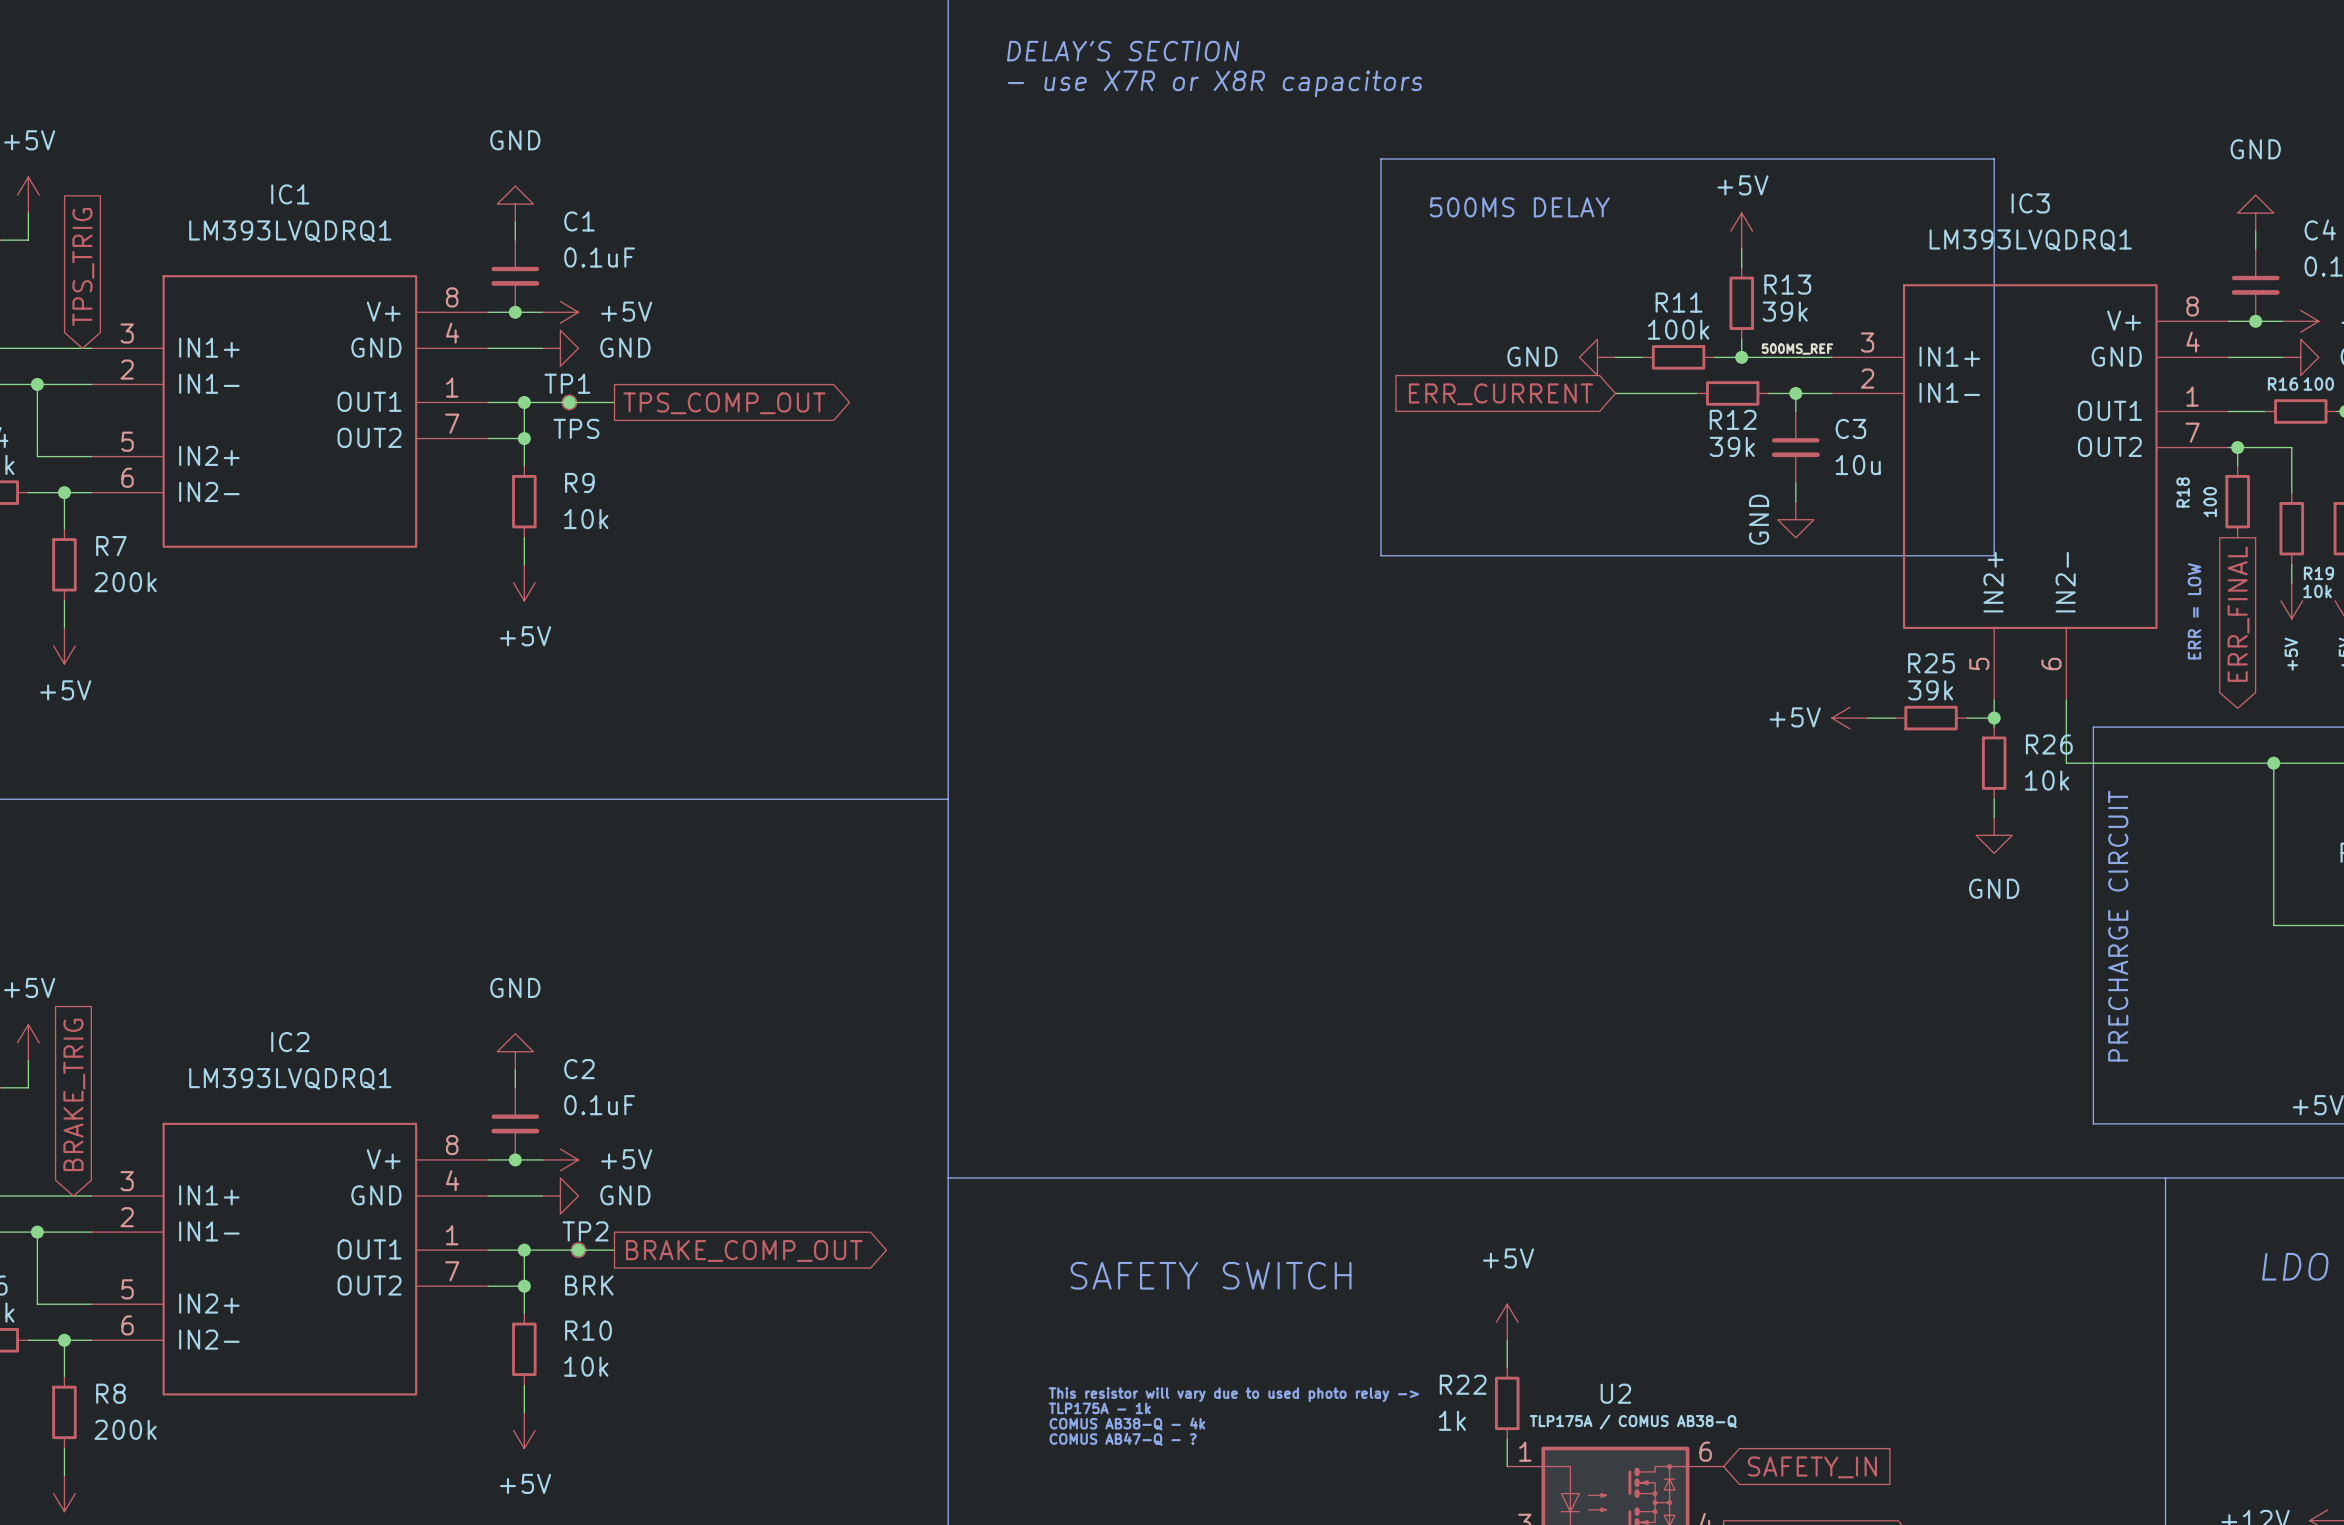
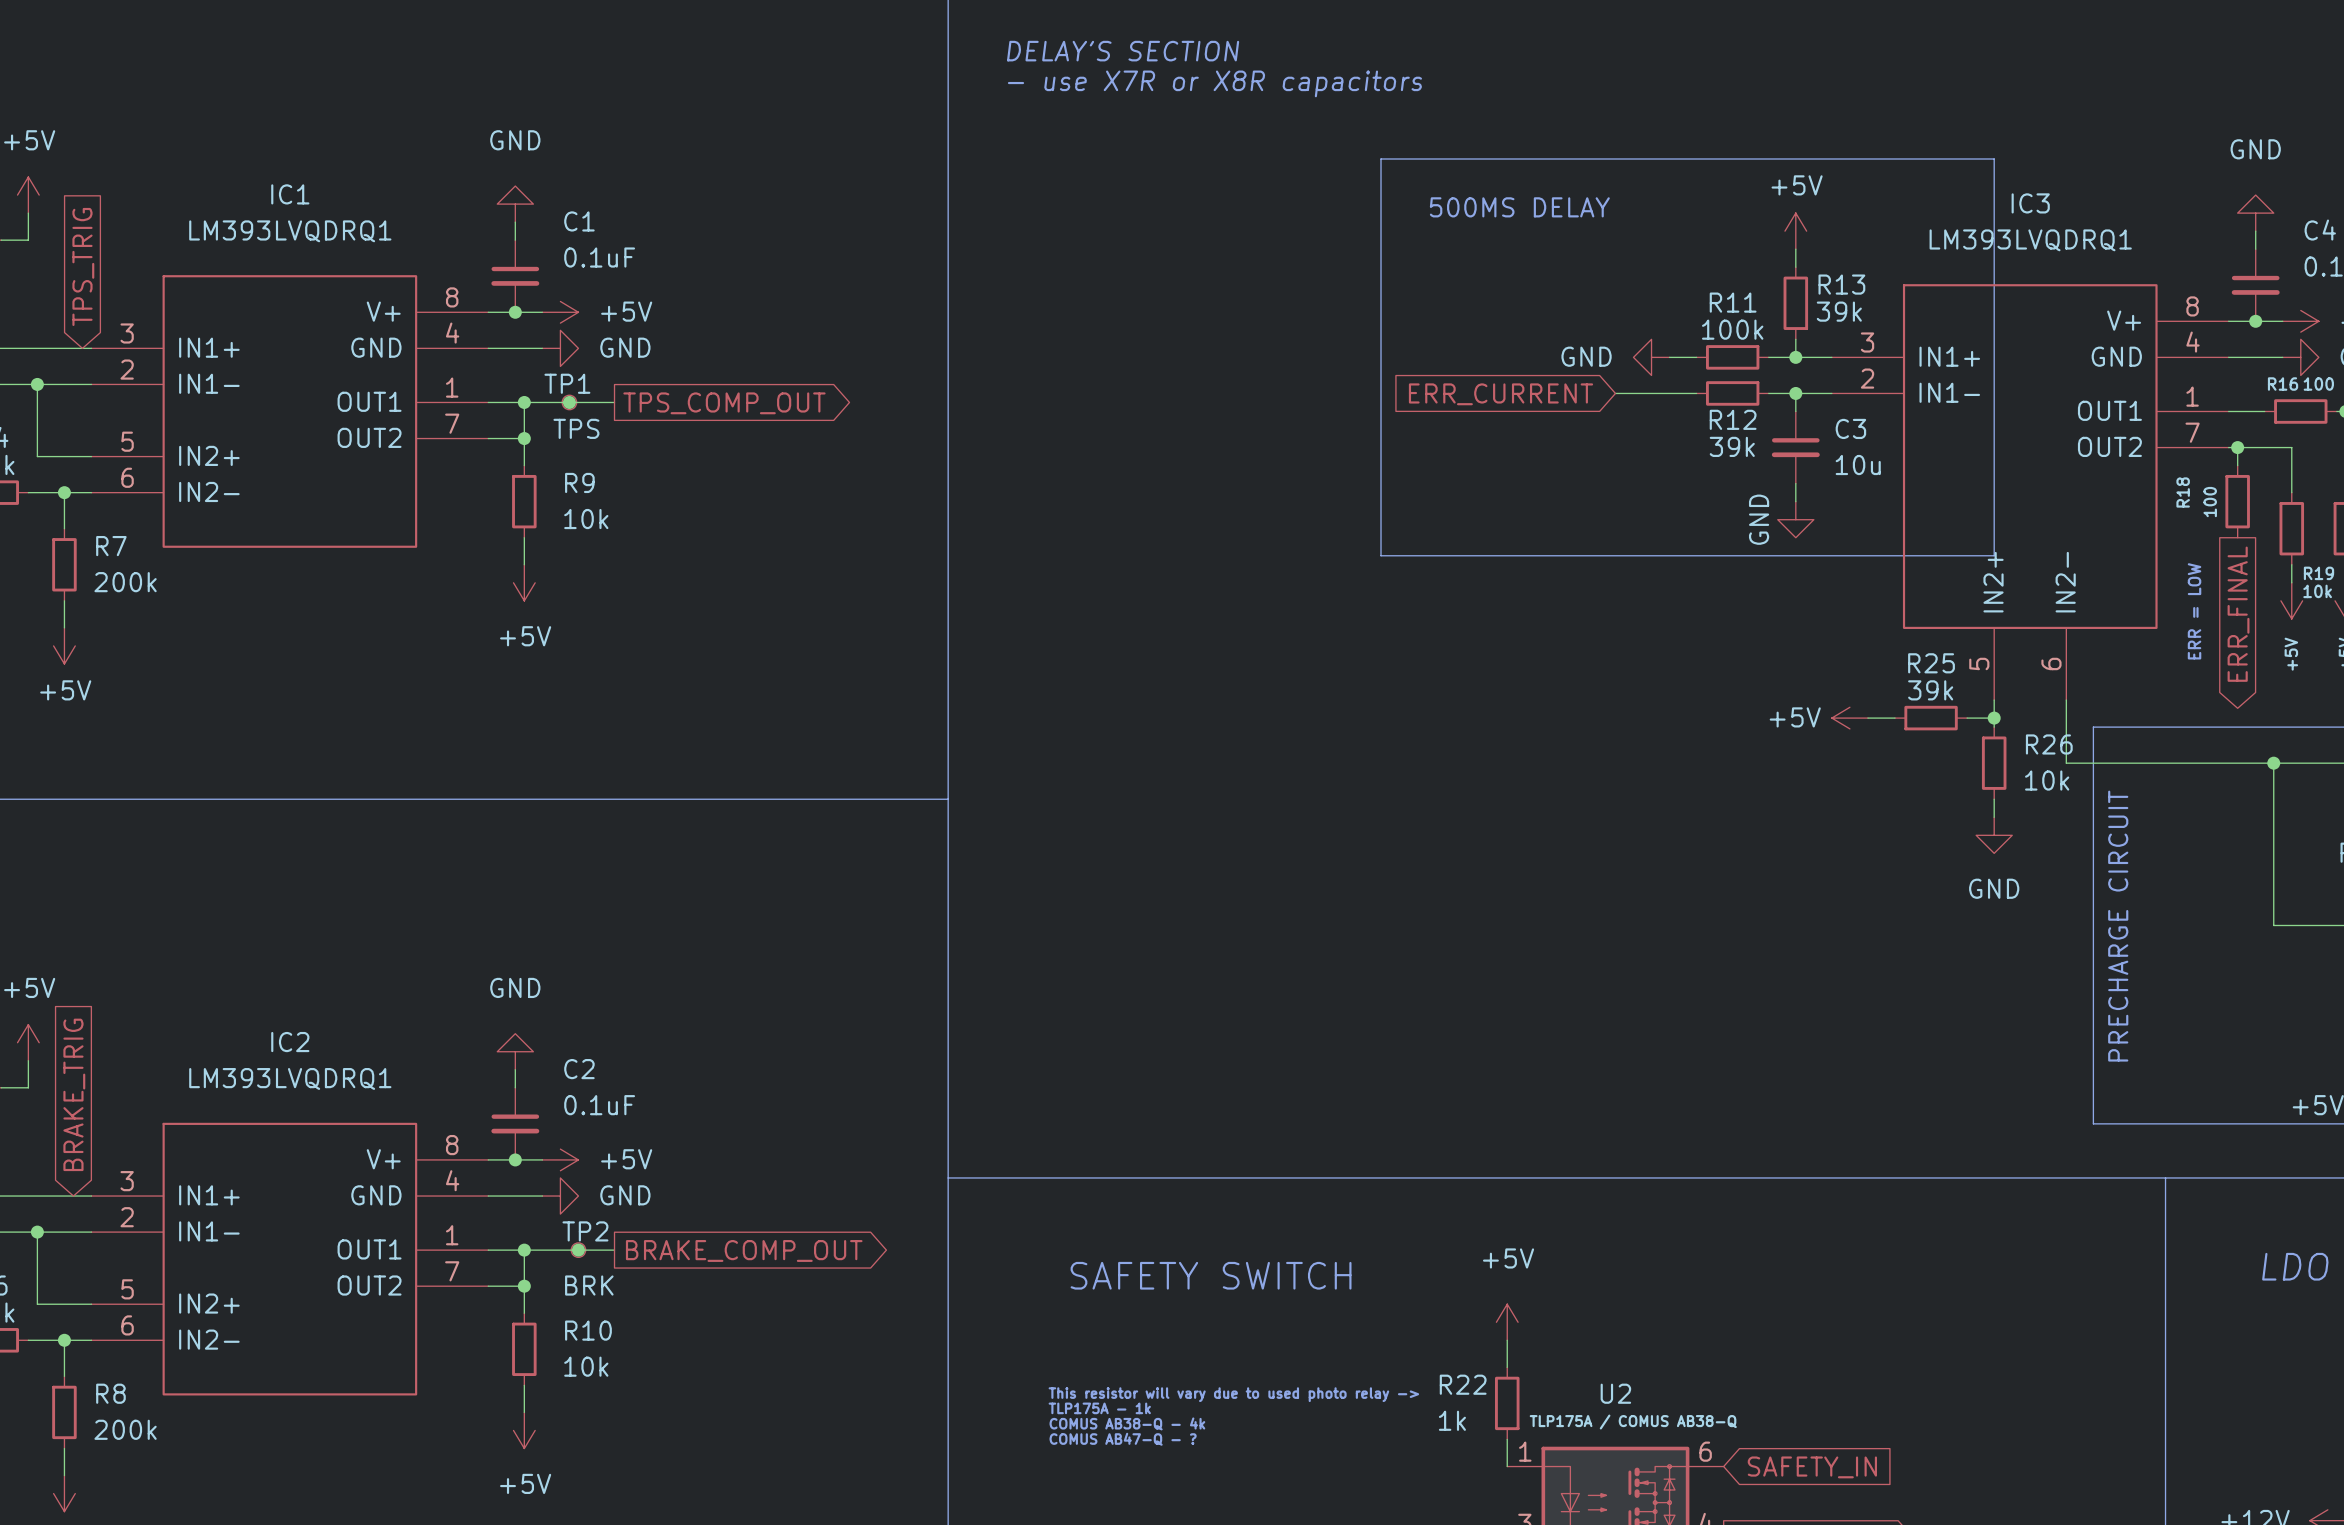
power symbol position: +5V (1741, 231) -> +5V (1795, 231)
wire: (1741, 249) (1741, 267) -> (1795, 249) (1795, 267)
R13 position: (1741, 303) -> (1795, 303)
wire: (1741, 339) (1741, 357) -> (1795, 339) (1795, 357)
label: 500MS_REF (1797, 349) -> none
power symbol position: GND (1597, 357) -> GND (1651, 357)
wire: (1615, 357) (1642, 357) -> (1669, 357) (1696, 357)
R11 position: (1678, 357) -> (1732, 357)
wire: (1714, 357) (1768, 357) -> none
junction position: (1741, 357) -> (1795, 357)

